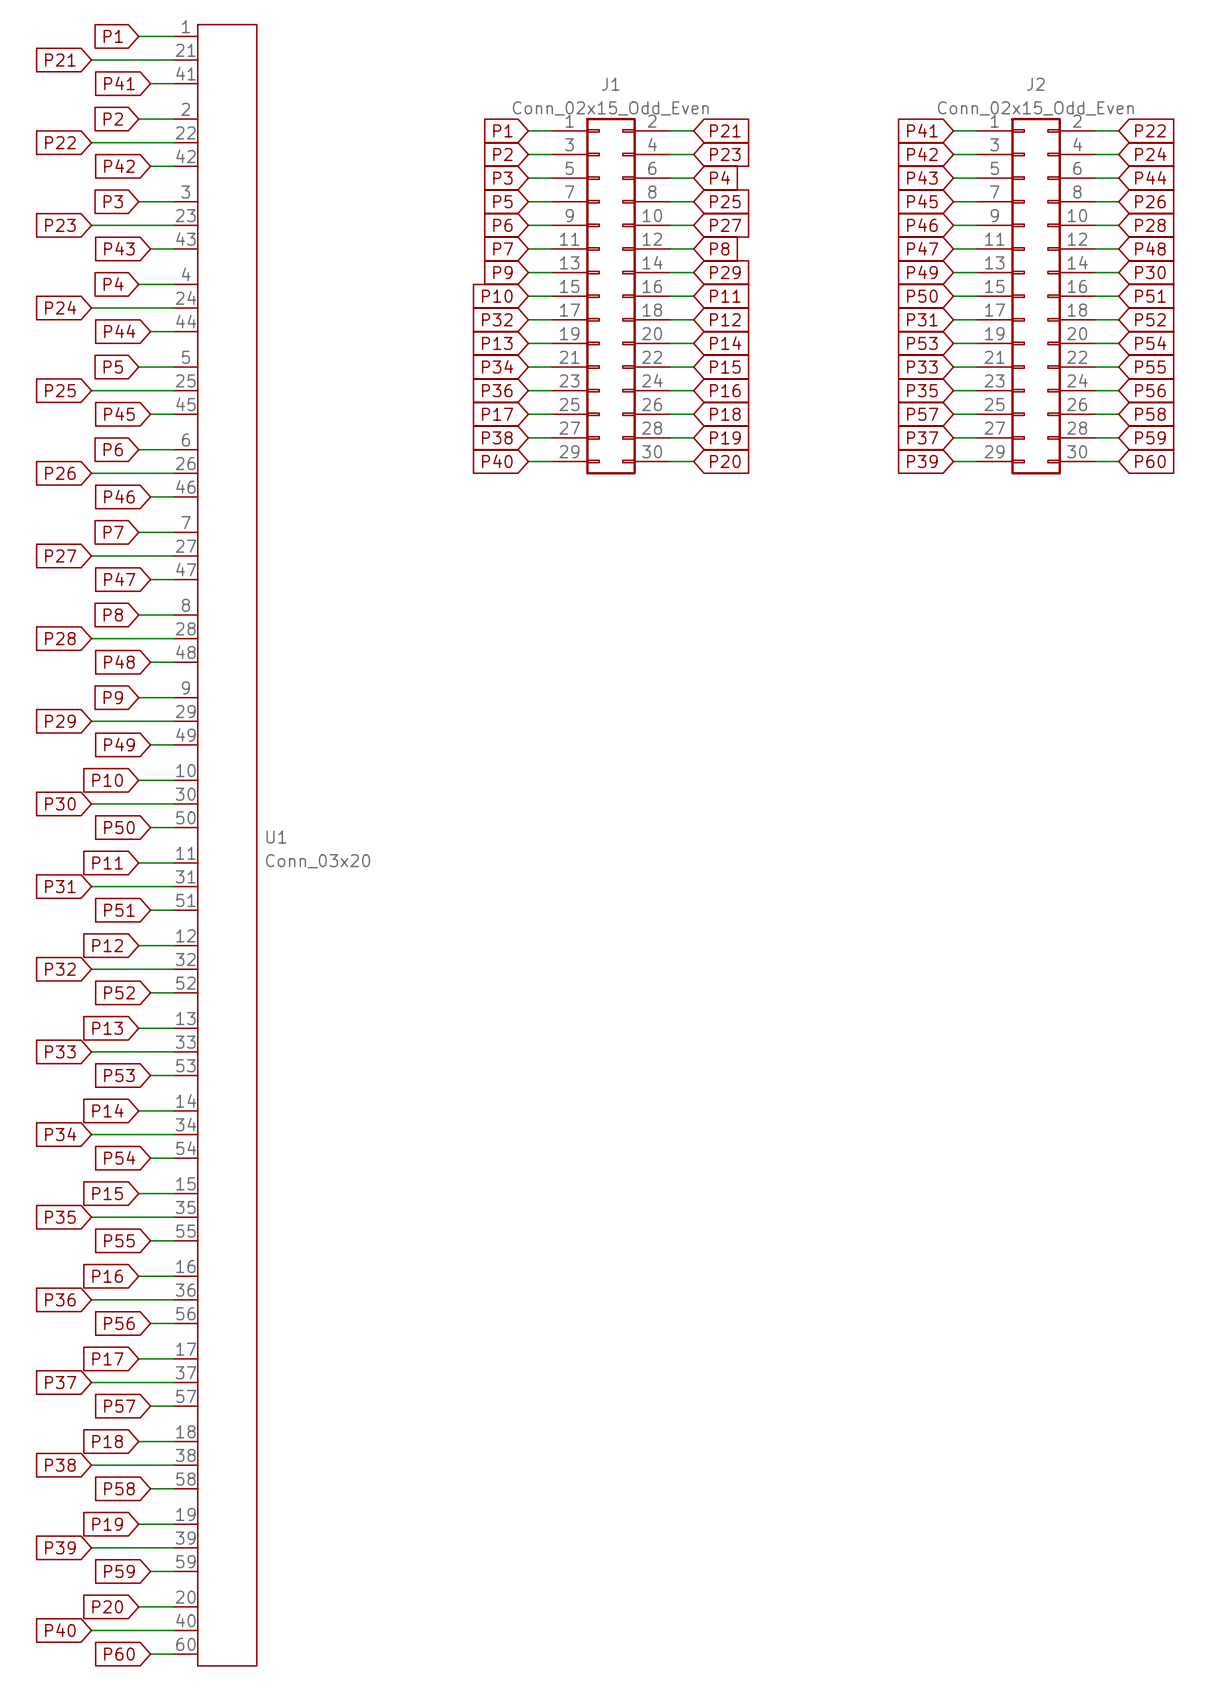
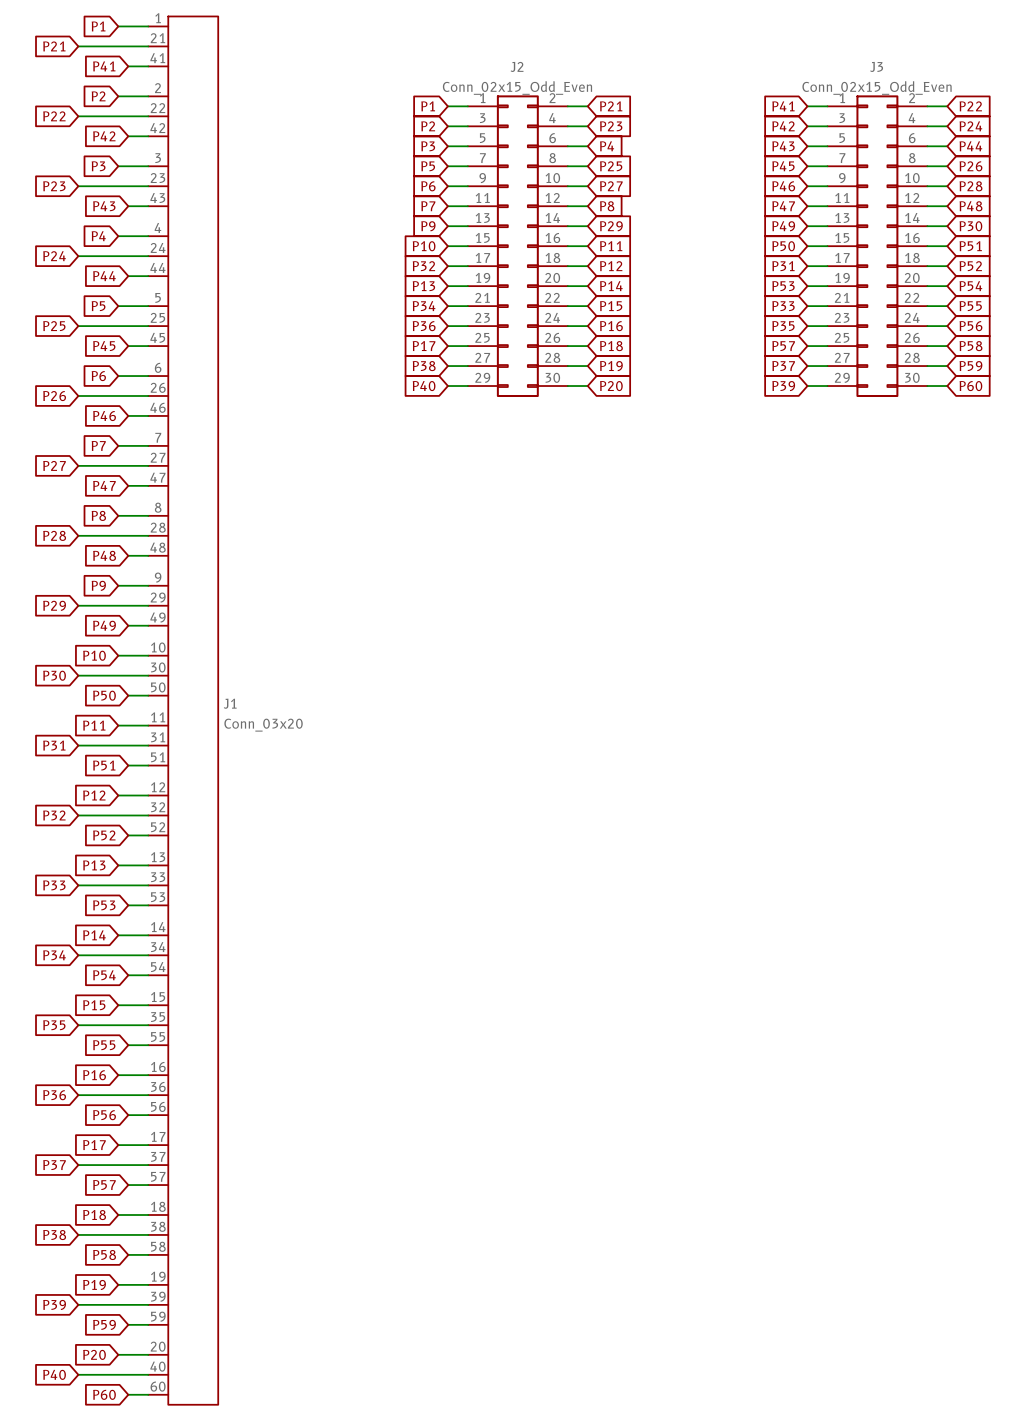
J1 name: J1 (610, 84) -> J2 (517, 66)
J2 name: J2 (1035, 84) -> J3 (876, 66)
U1 name: U1 (276, 837) -> J1 (230, 703)

